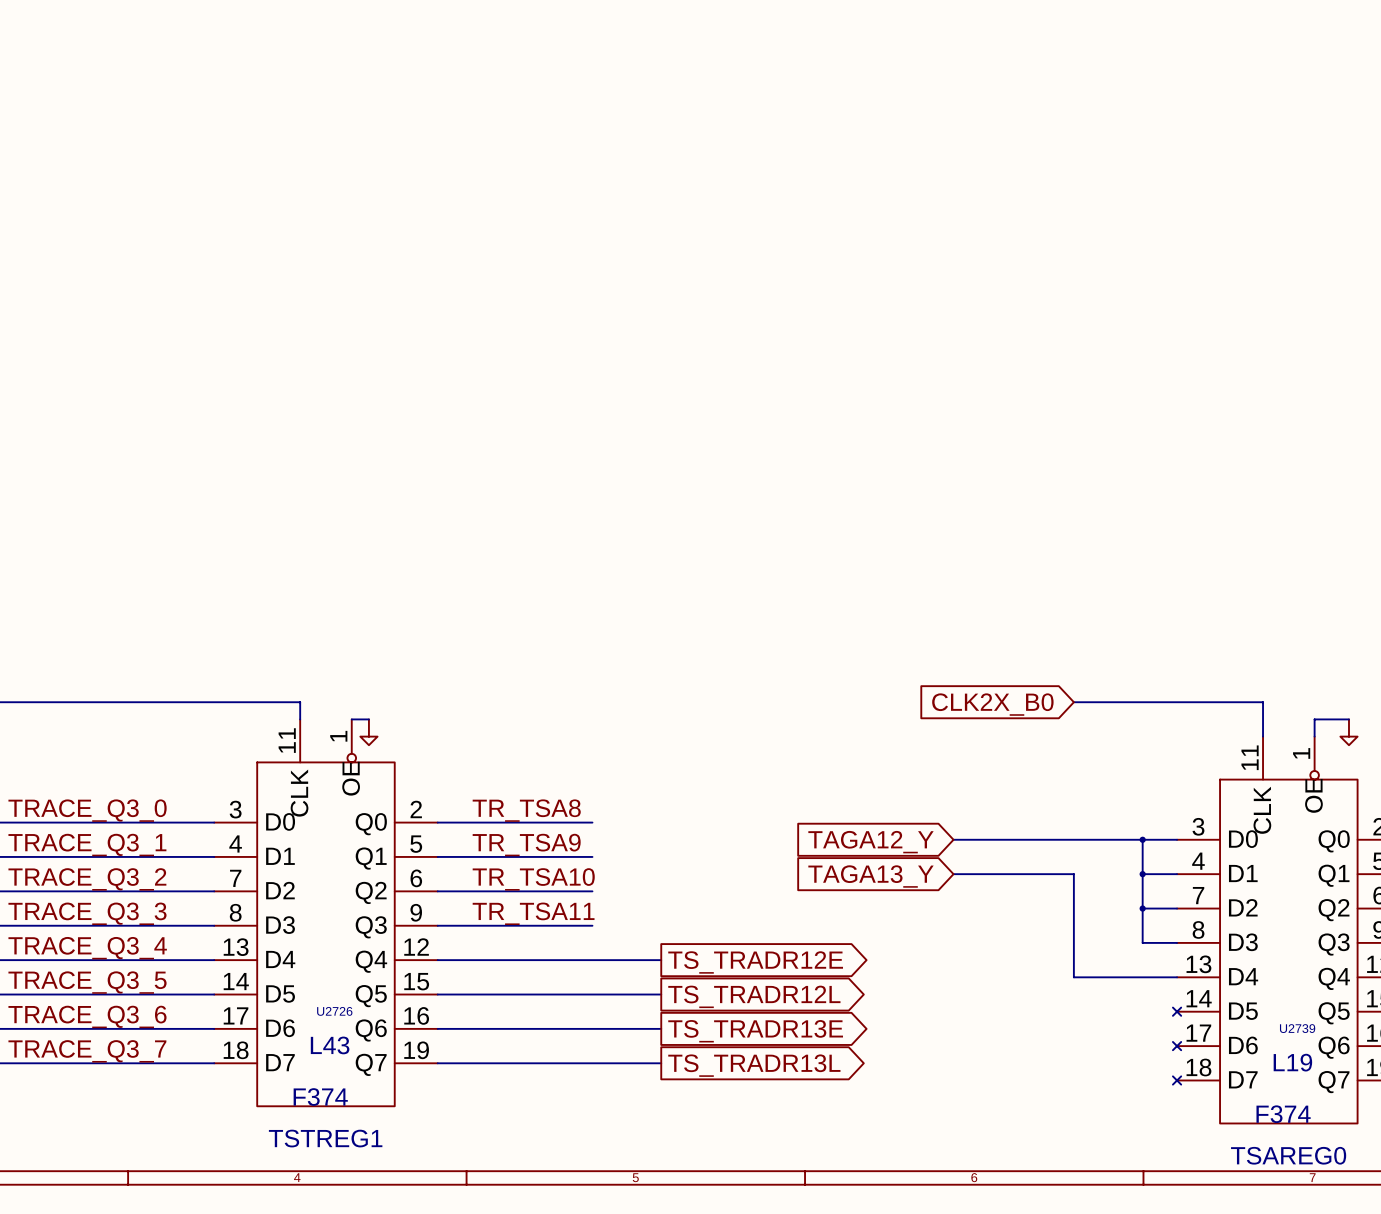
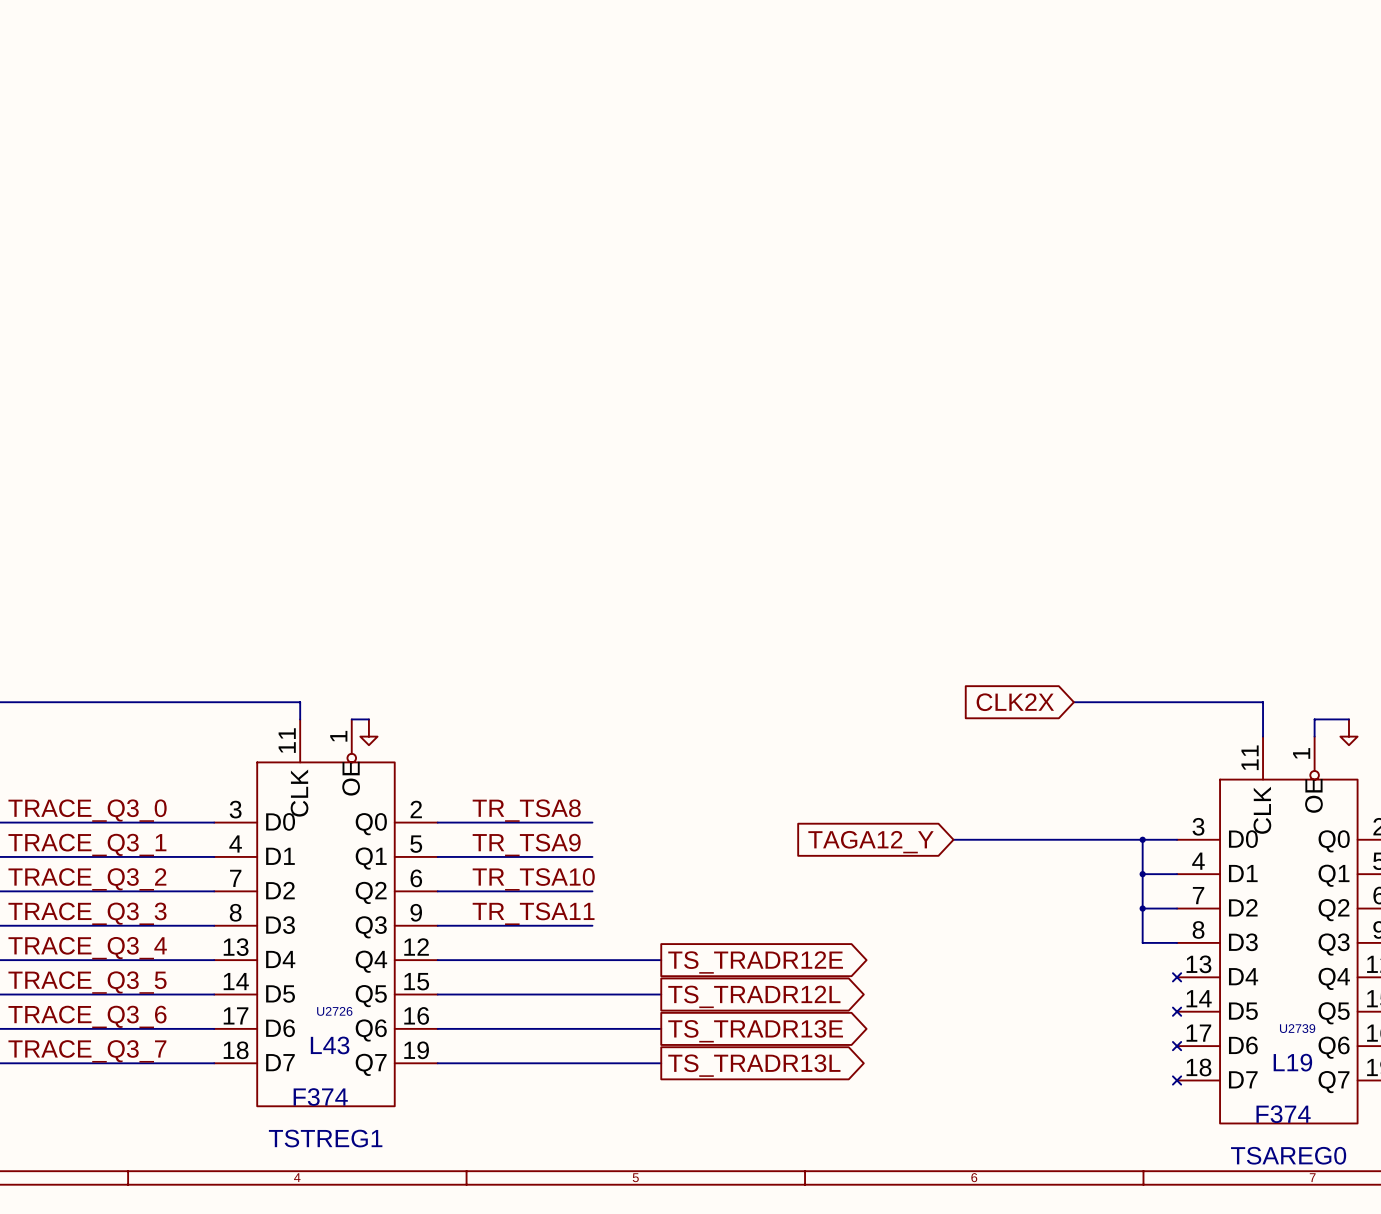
global label: CLK2X_B0 (992, 704) -> CLK2X (1015, 702)
wire: (953, 874) (1073, 874) (1073, 977) (1177, 977) -> none
global label: TAGA13_Y (870, 876) -> none
no-connect mark: none -> (1177, 977)

